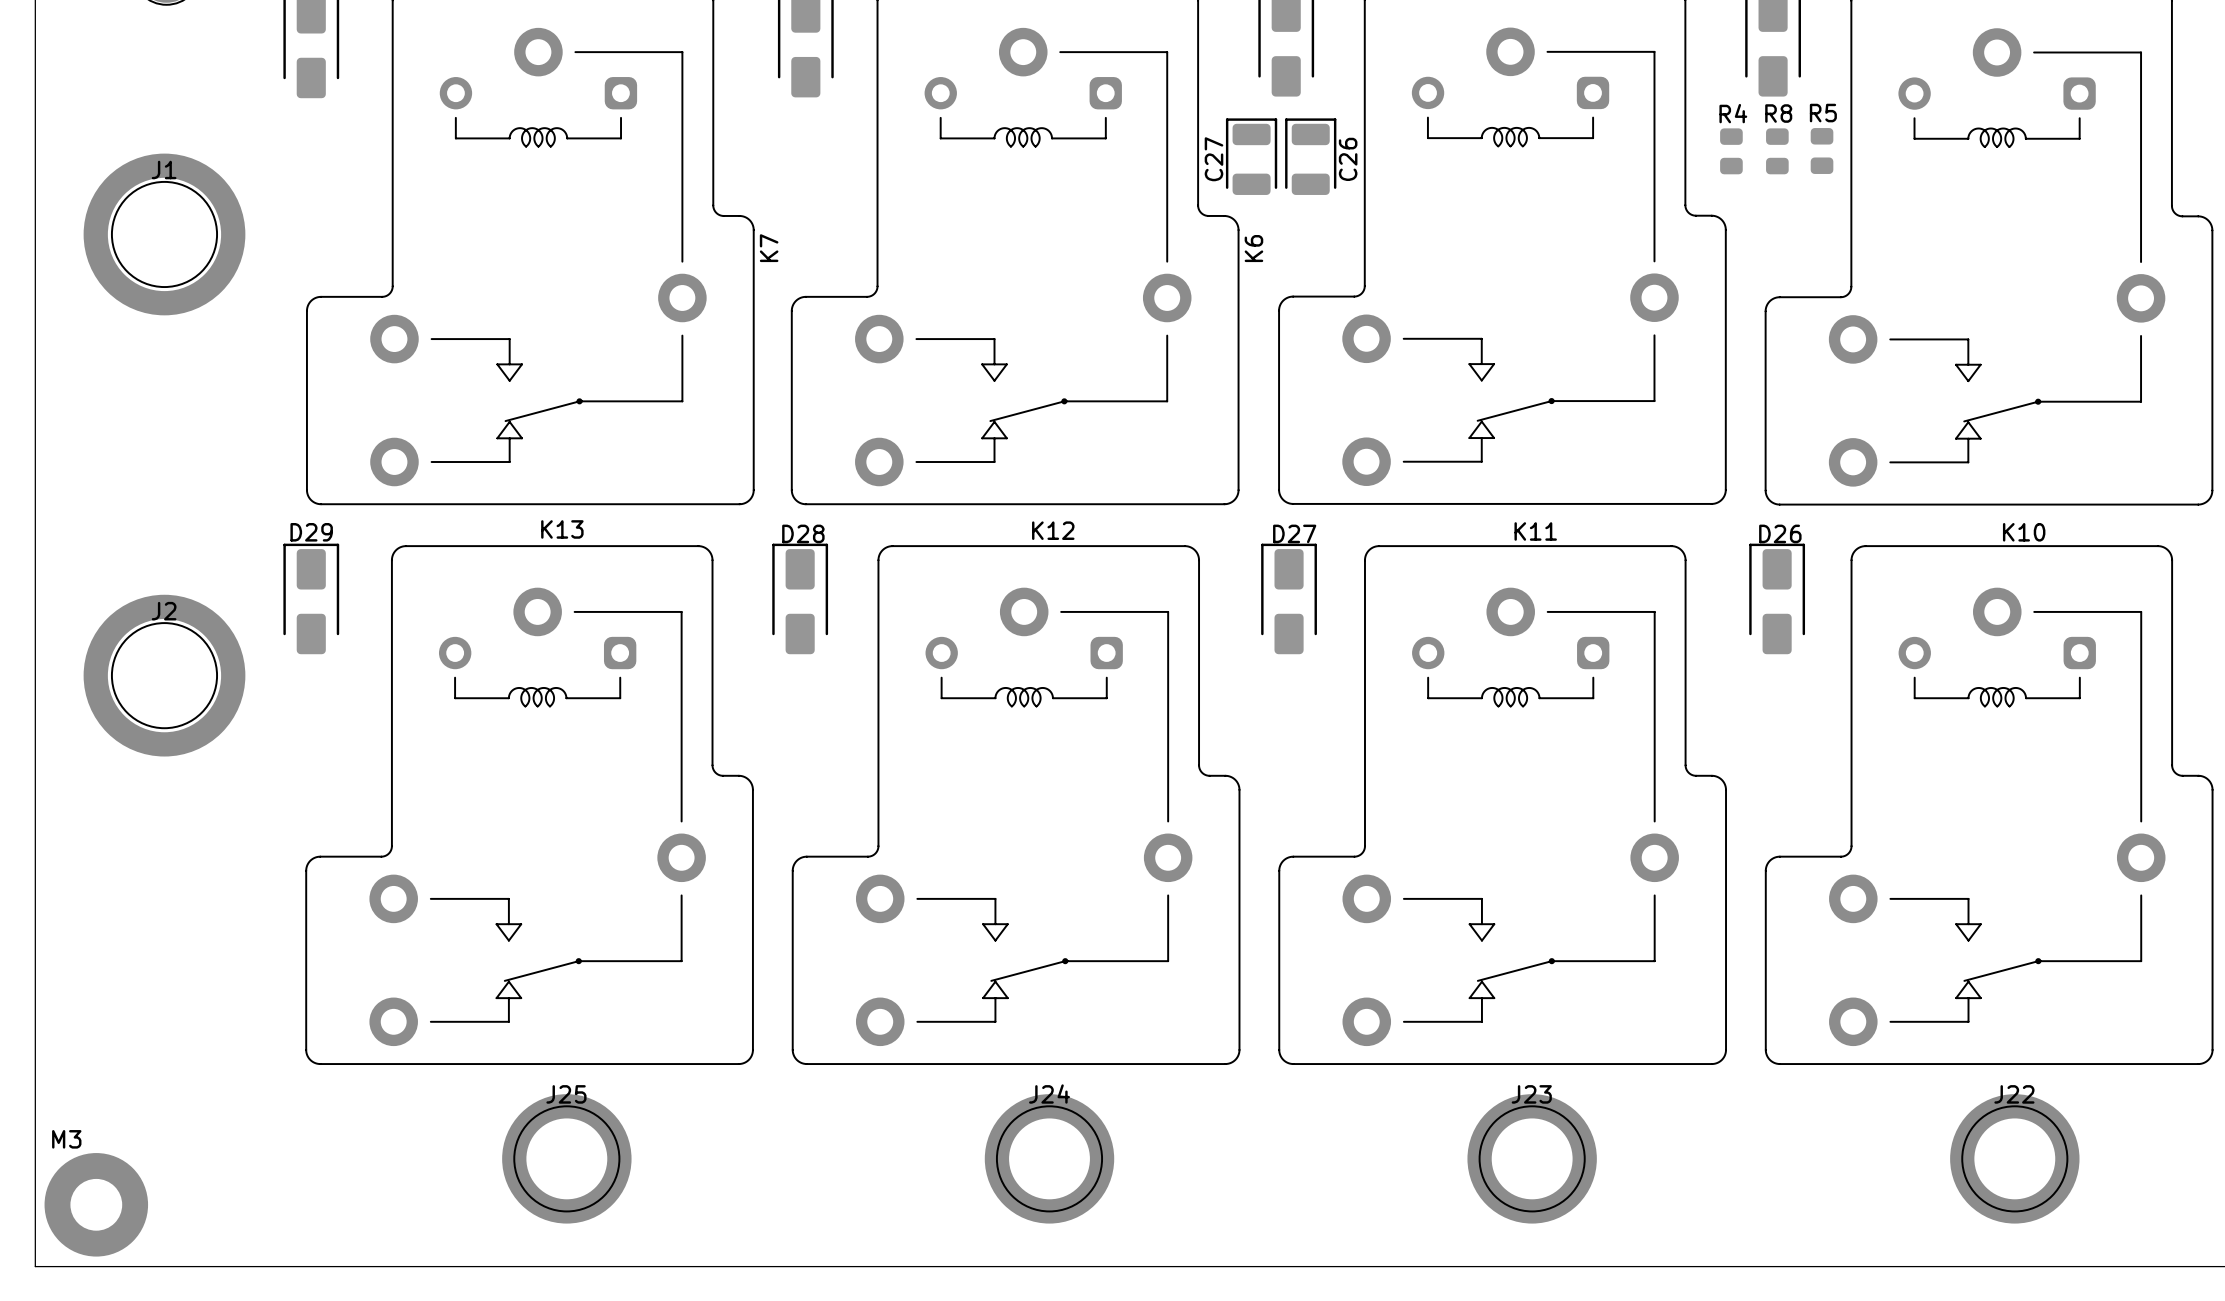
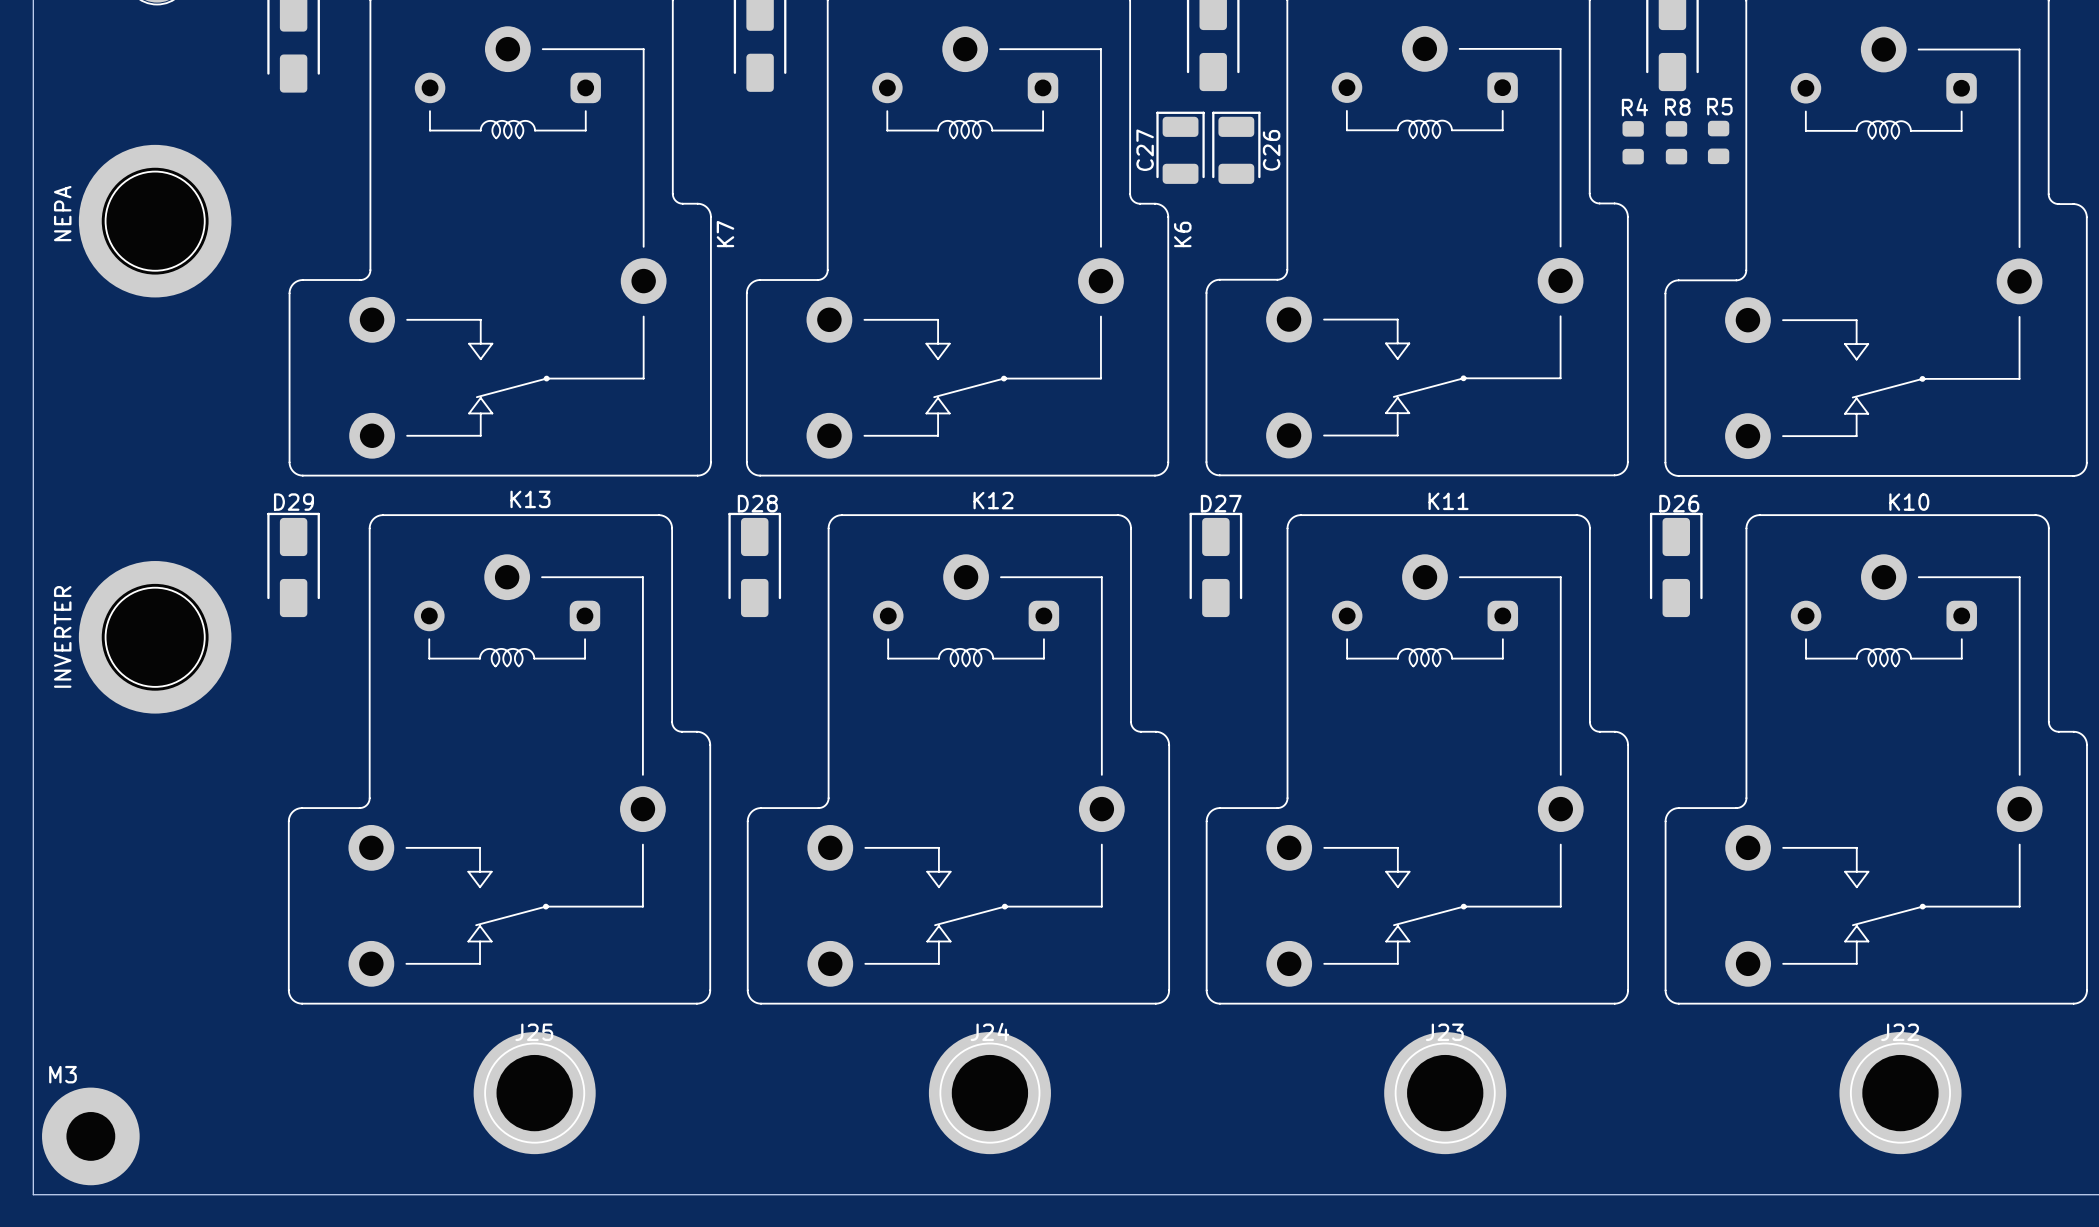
J1 name: J1 (164, 170) -> none
J1 value: none -> NEPA (62, 213)
J2 name: J2 (164, 611) -> none
J2 value: none -> INVERTER (62, 636)

